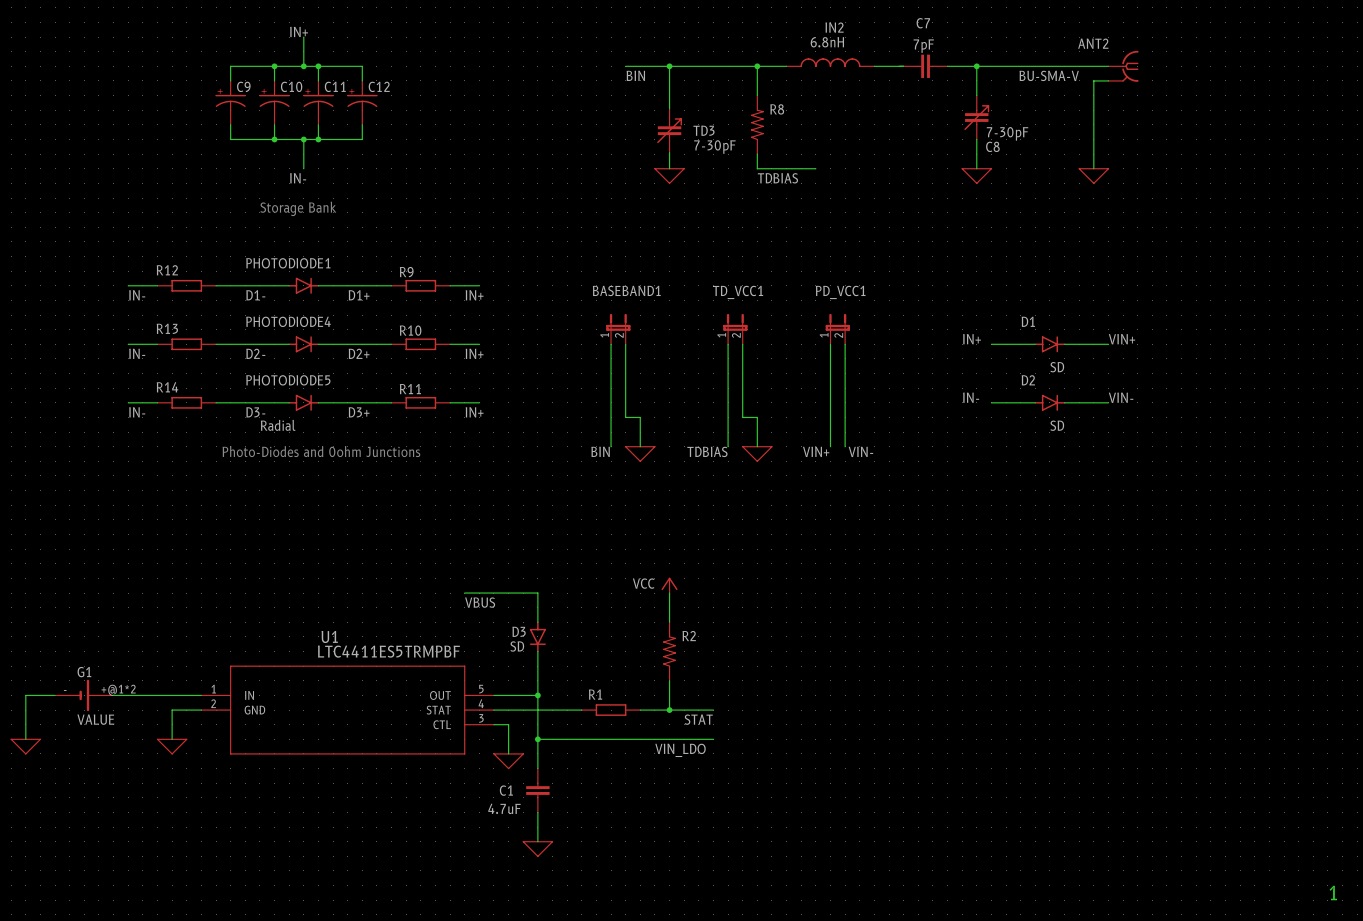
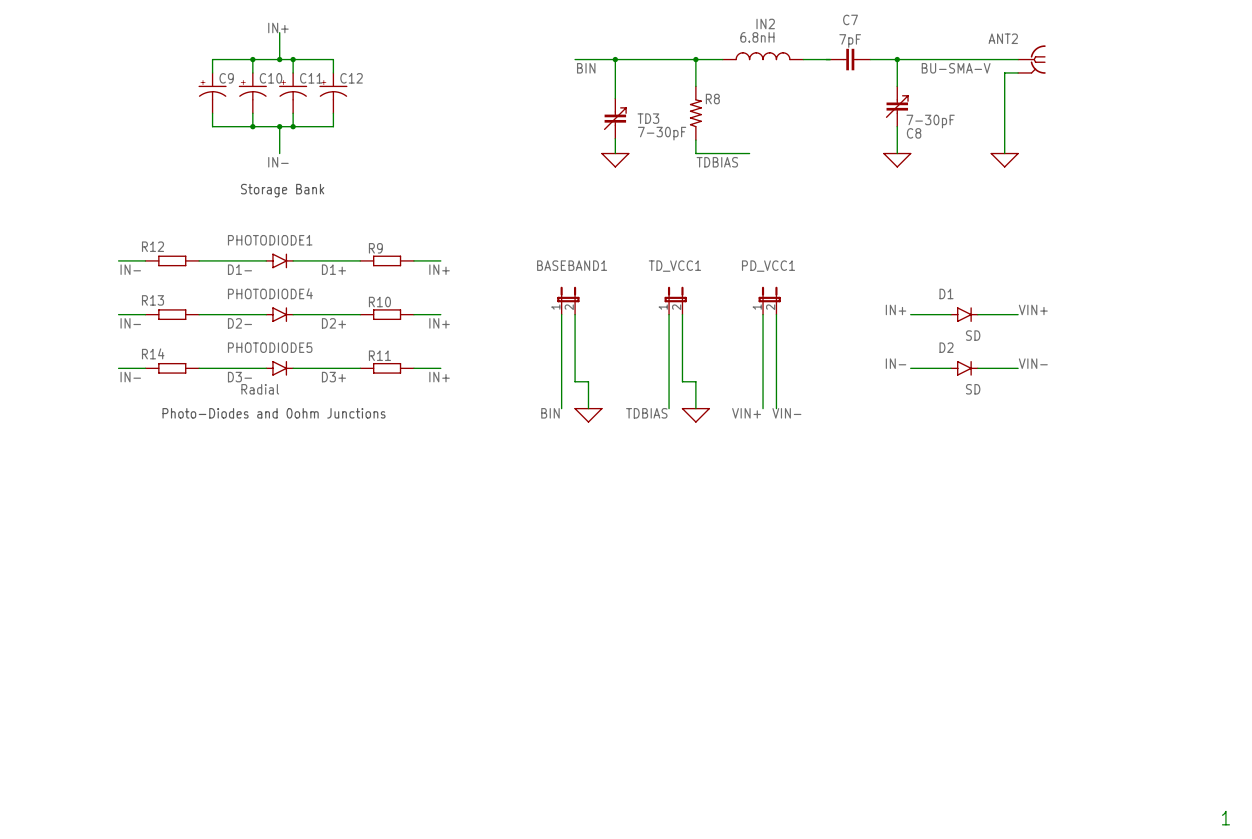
power symbol: VCC (669, 585) -> none
wire: (464, 593) (537, 593) (537, 622) -> none
wire: (669, 593) (669, 622) -> none
label: VBUS (480, 602) -> none
D3: SD (537, 636) -> none
wire: (537, 651) (537, 768) -> none
R2: (669, 651) -> none
wire: (669, 680) (669, 710) -> none
wire: (55, 695) (25, 695) (25, 739) -> none
G1: VALUE (84, 695) -> none
wire: (113, 695) (201, 695) -> none
wire: (493, 695) (537, 695) -> none
junction: (537, 695) -> none
wire: (201, 710) (172, 710) (172, 739) -> none
U1: LTC4411ES5TRMPBF (347, 710) -> none
wire: (493, 710) (581, 710) -> none
R1: (611, 710) -> none
wire: (640, 710) (713, 710) -> none
junction: (669, 710) -> none
label: STAT (698, 719) -> none
wire: (493, 724) (508, 724) (508, 753) -> none
wire: (537, 739) (713, 739) -> none
junction: (537, 739) -> none
power symbol: (25, 746) -> none
power symbol: (172, 746) -> none
label: VIN_LDO (680, 750) -> none
power symbol: (508, 761) -> none
C1: 4.7uF (537, 790) -> none
wire: (537, 812) (537, 841) -> none
power symbol: (537, 849) -> none

